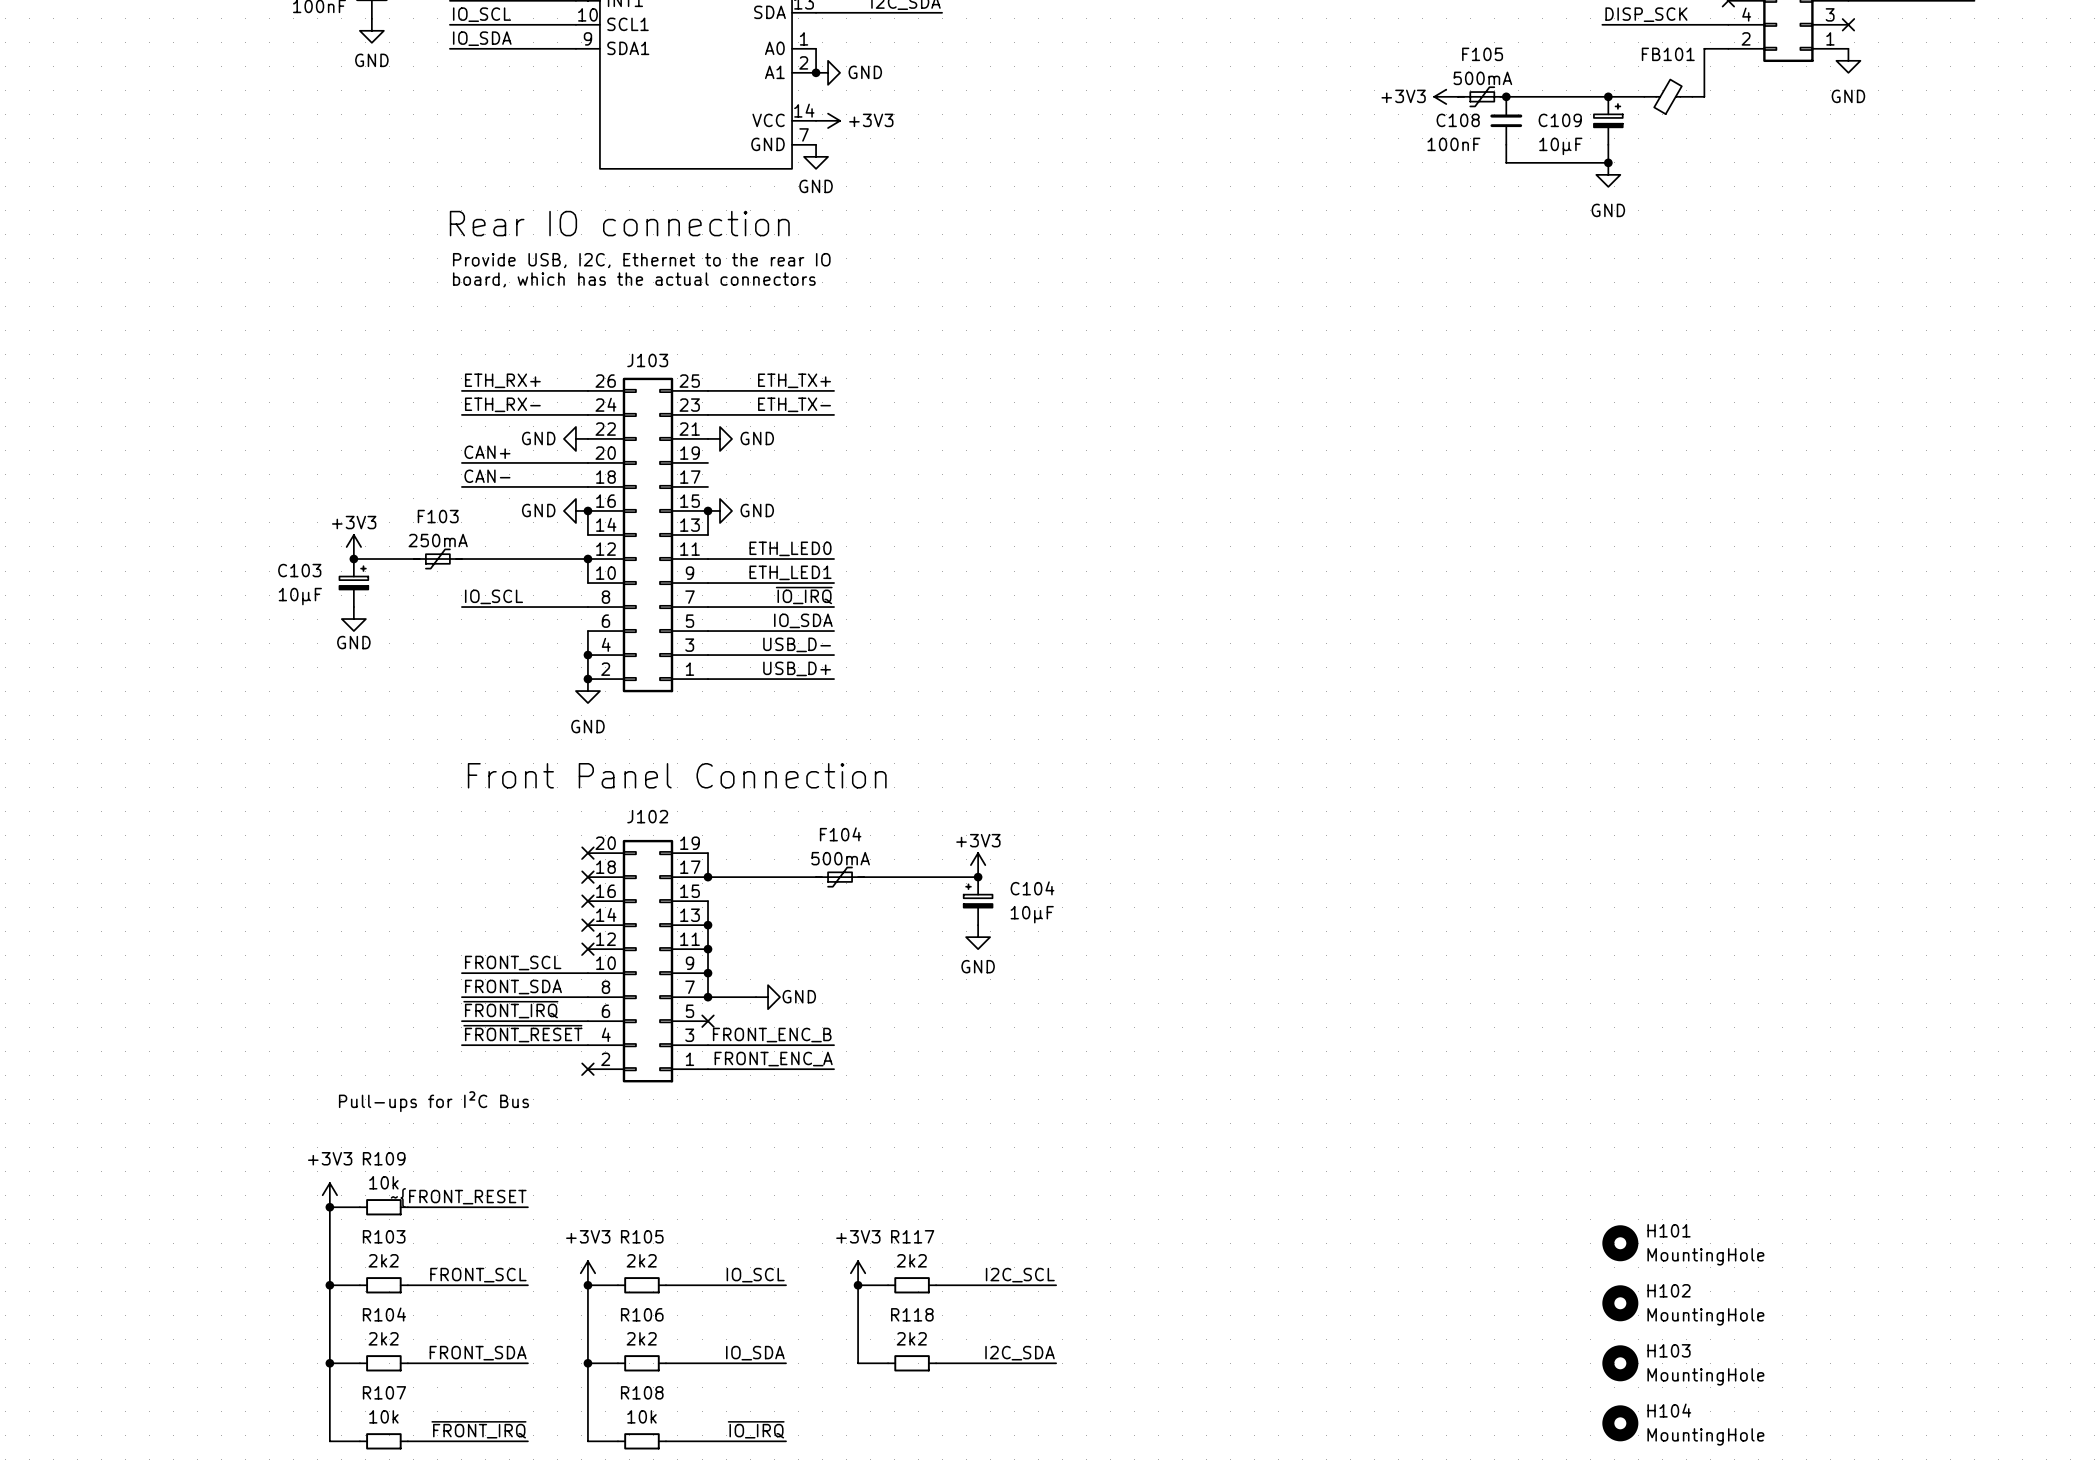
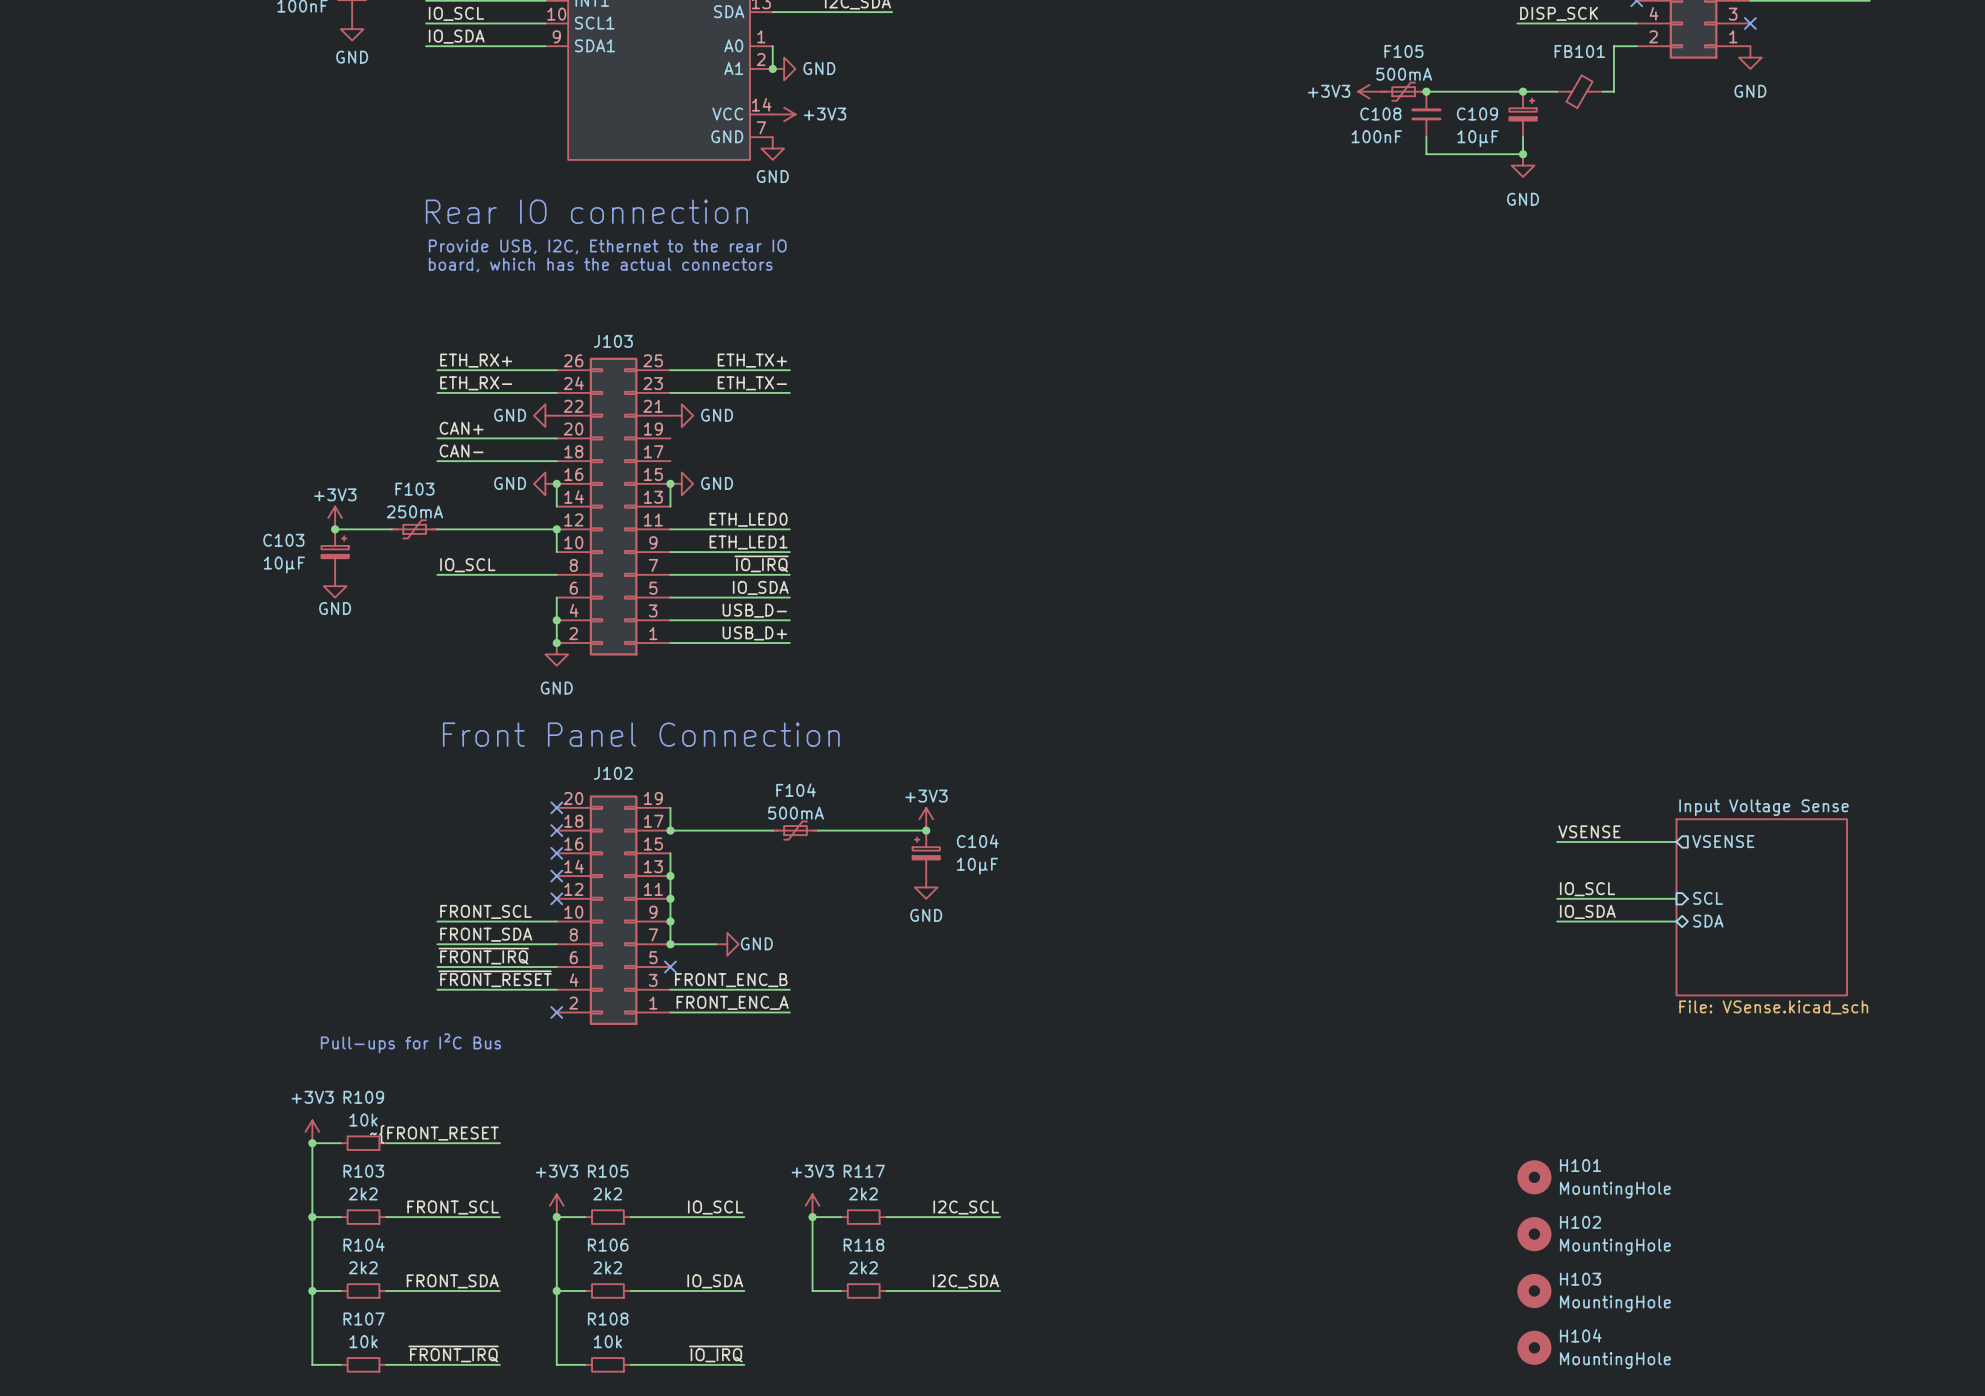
label: none -> VSENSE (1589, 831)
sheet pin: none -> VSENSE (1723, 841)
wire: none -> (1557, 841) (1676, 841)
label: none -> IO_SCL (1587, 889)
sheet pin: none -> SCL (1708, 898)
wire: none -> (1557, 898) (1676, 898)
sheet Input Voltage Sense: none -> File: VSense.kicad_sch (1761, 907)
label: none -> IO_SDA (1587, 911)
sheet pin: none -> SDA (1708, 921)
wire: none -> (1557, 921) (1676, 921)

